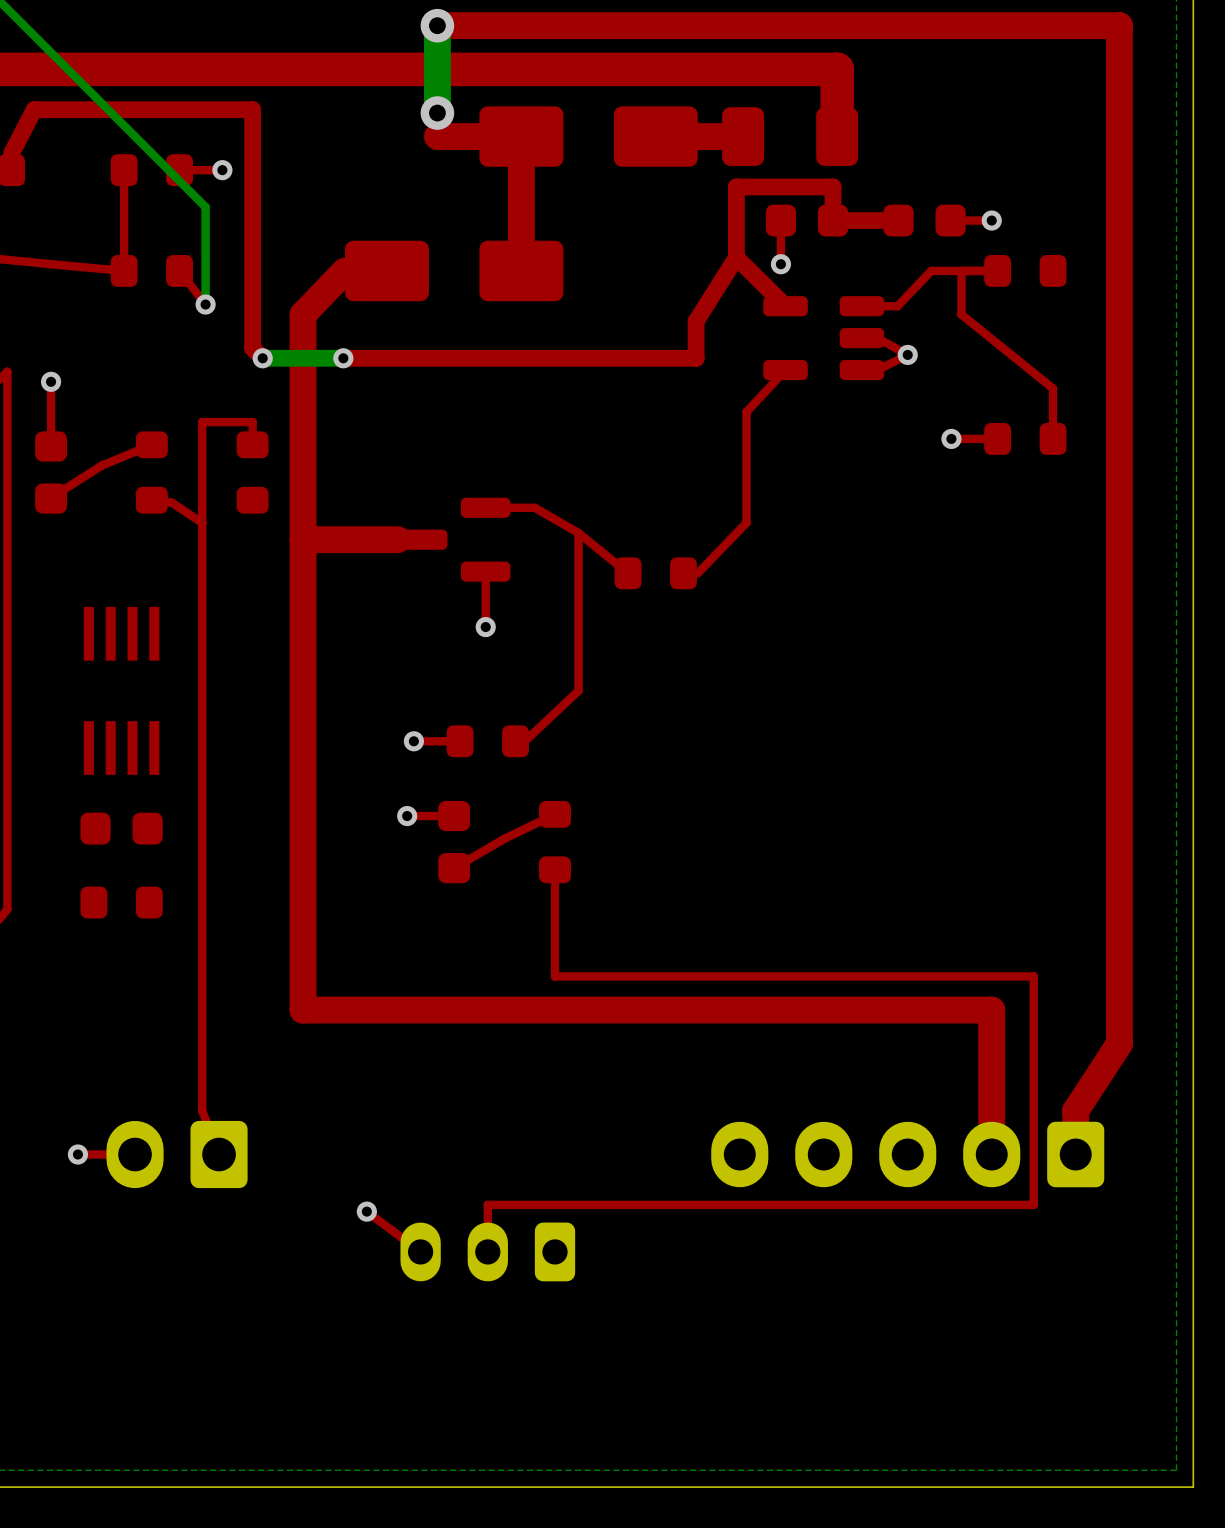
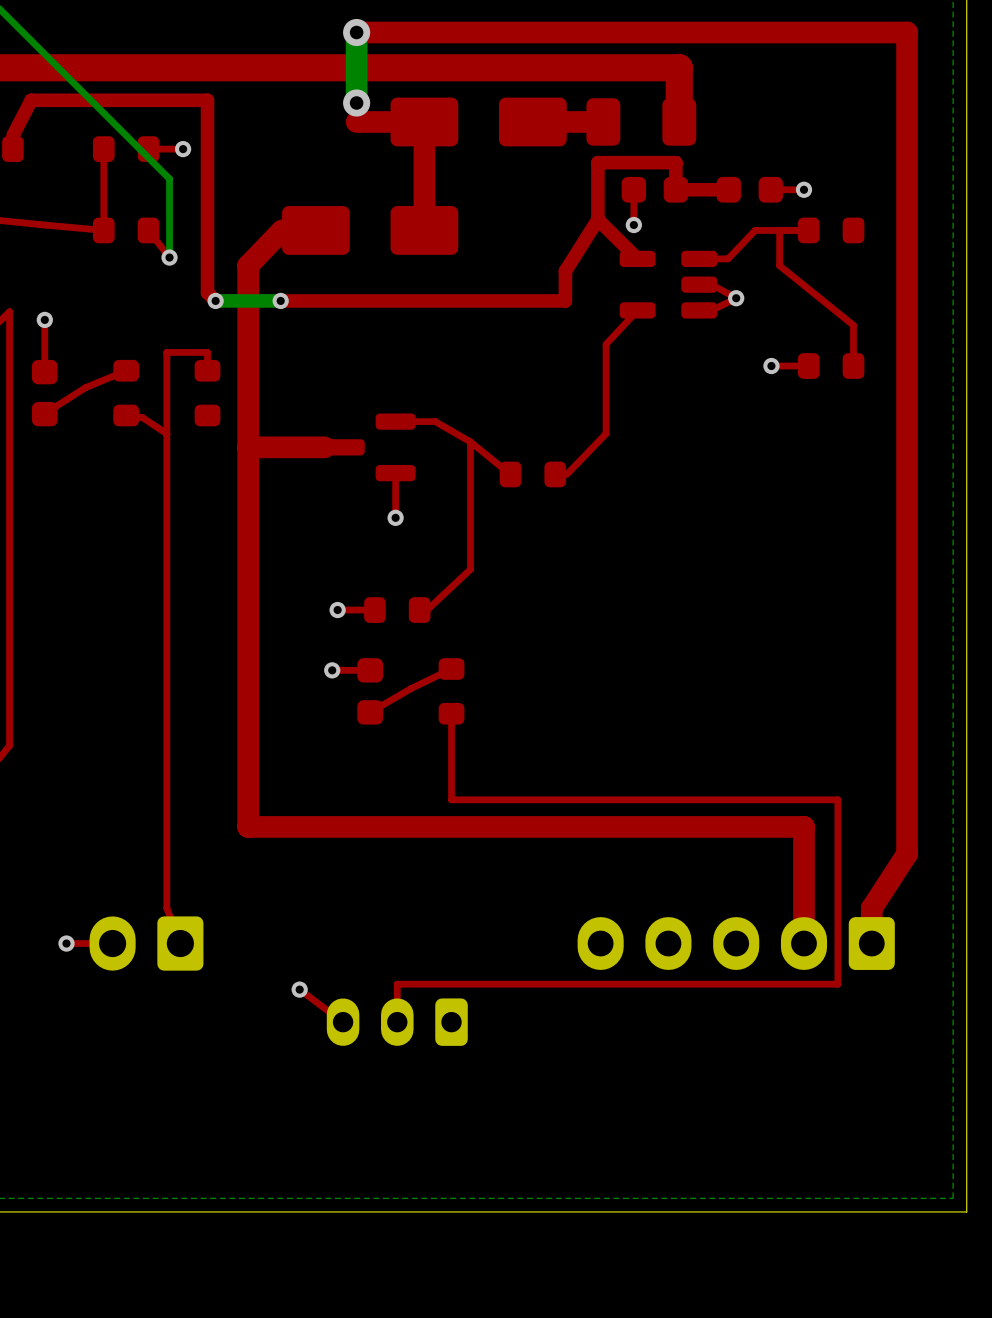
part: (121, 690) -> none
part: (121, 828) -> none
part: (121, 902) -> none

